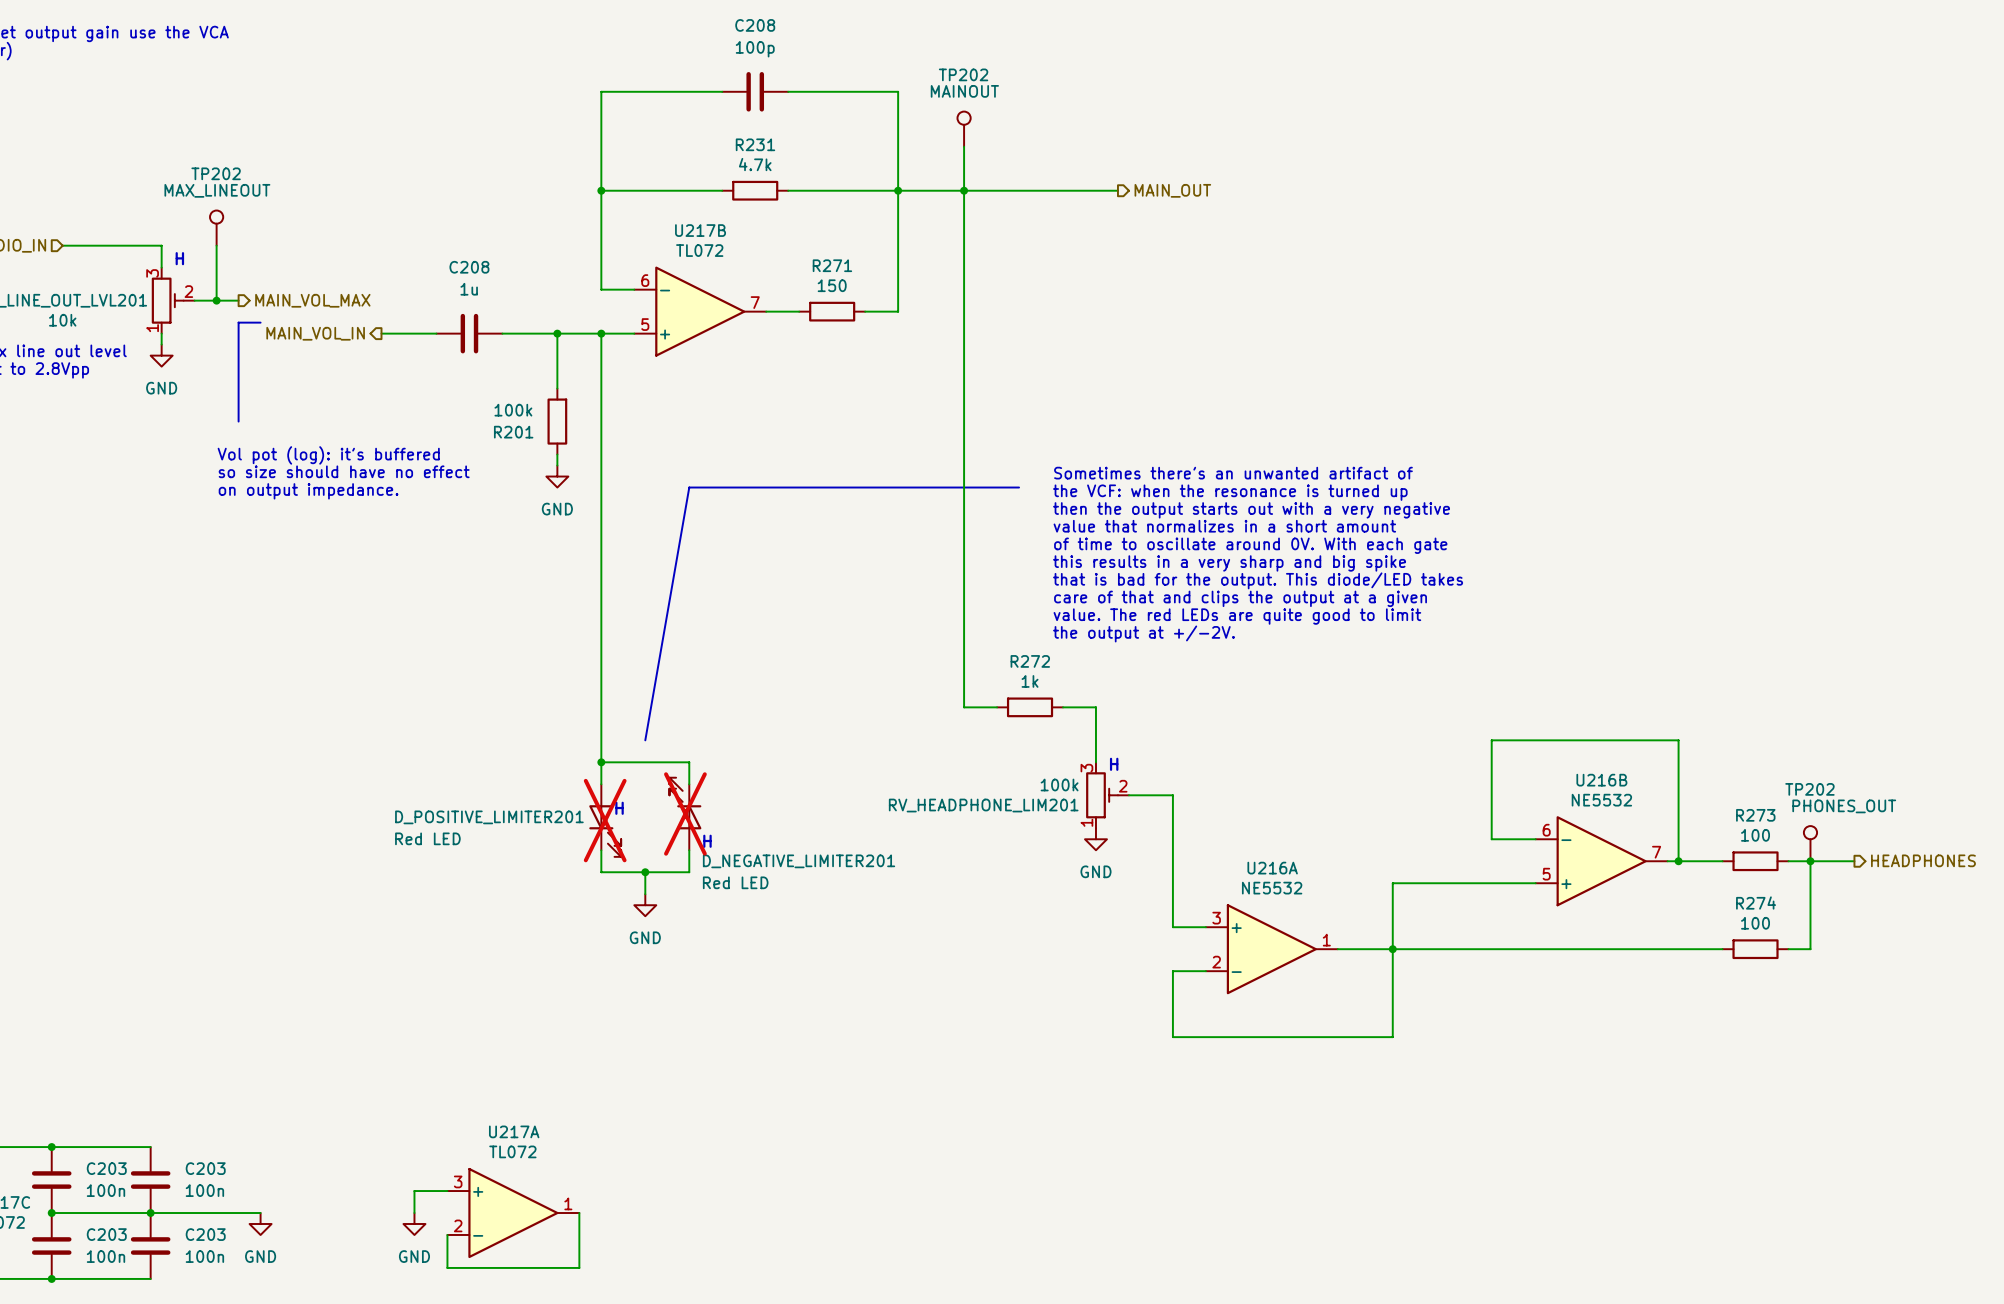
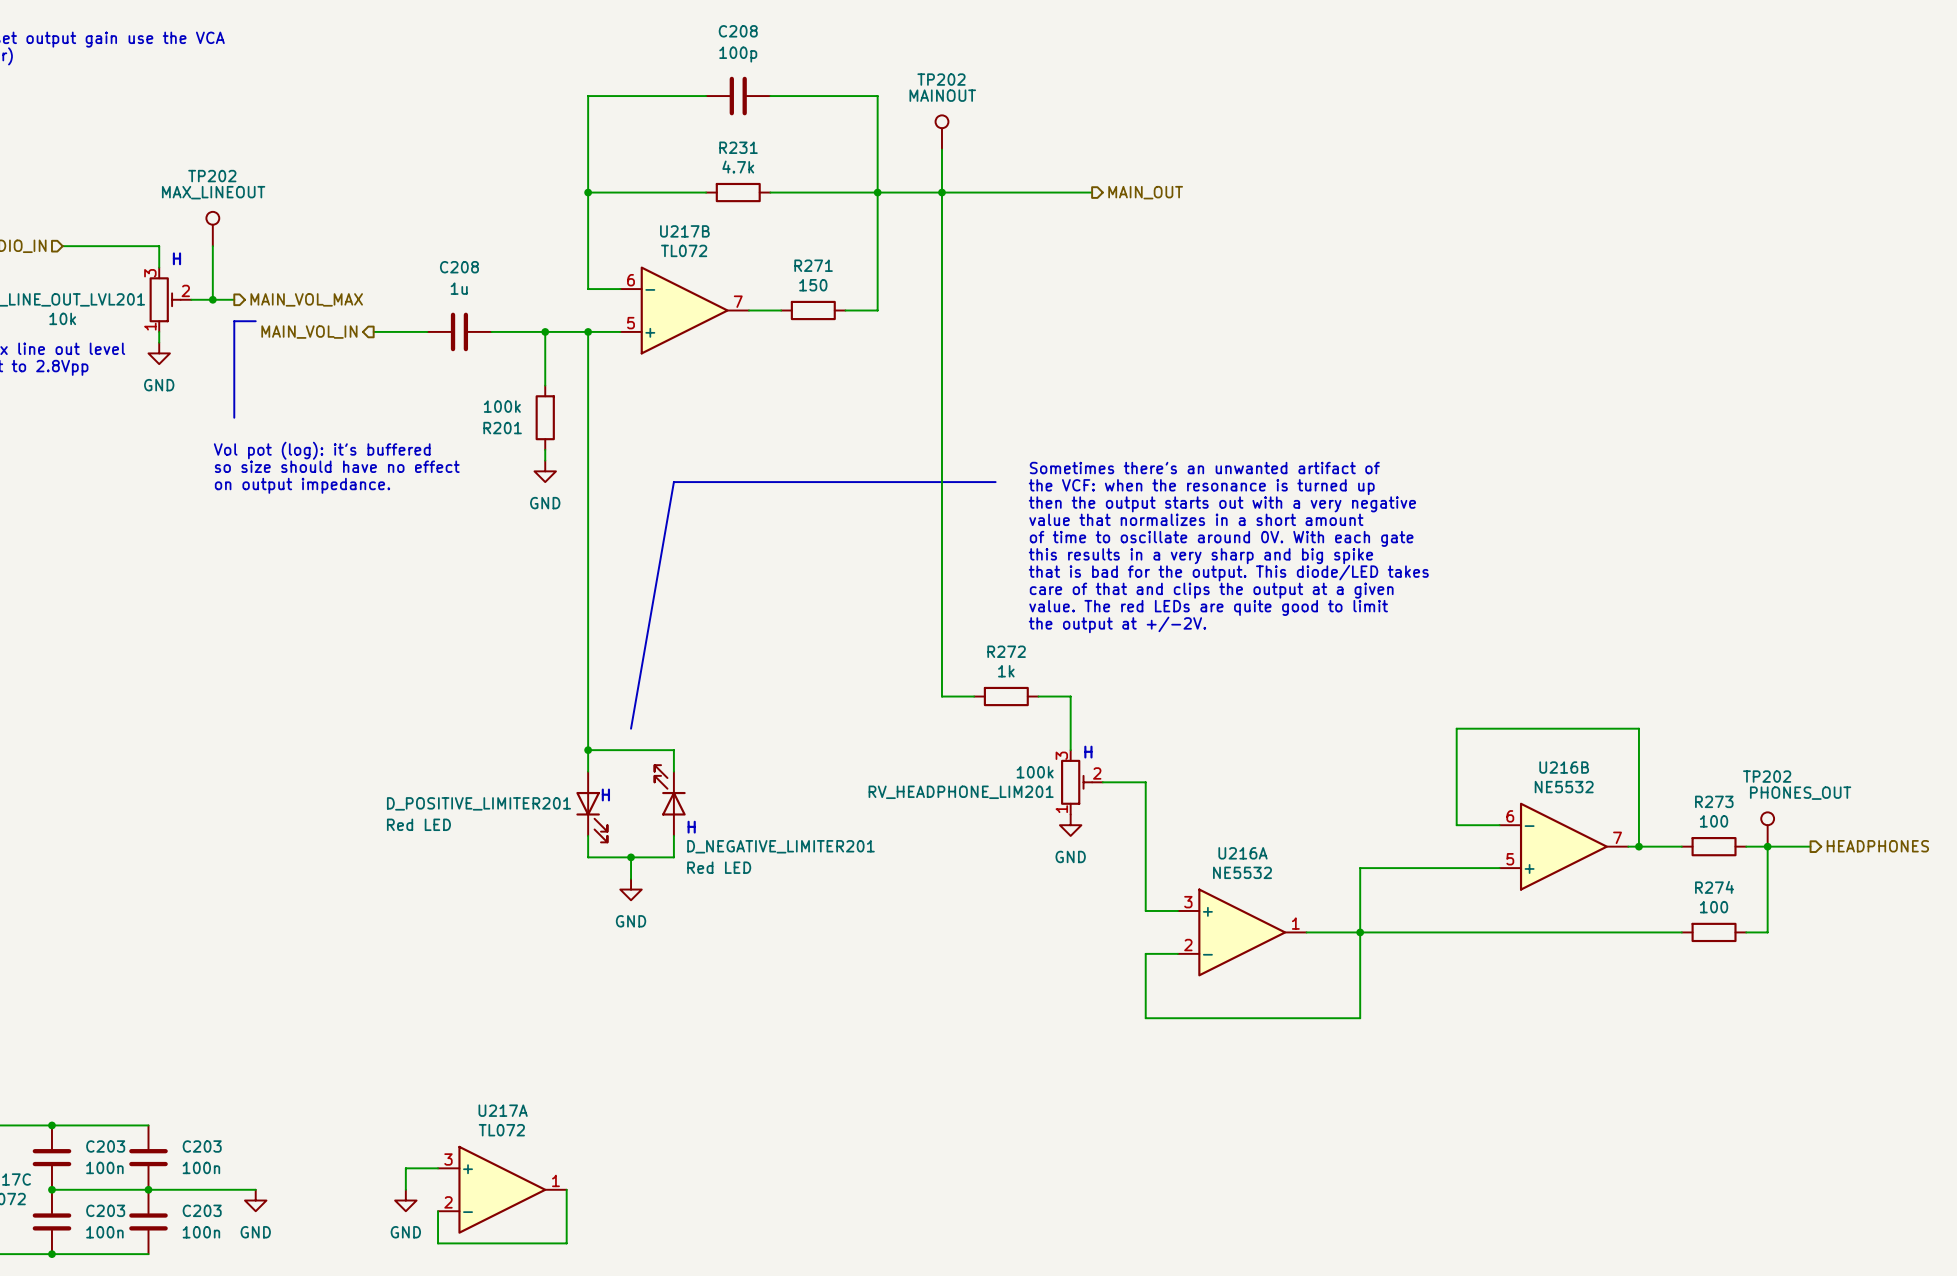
D_NEGATIVE_LIMITER201 do-not-place cross: (685, 813) -> none
D_POSITIVE_LIMITER201 do-not-place cross: (605, 820) -> none

